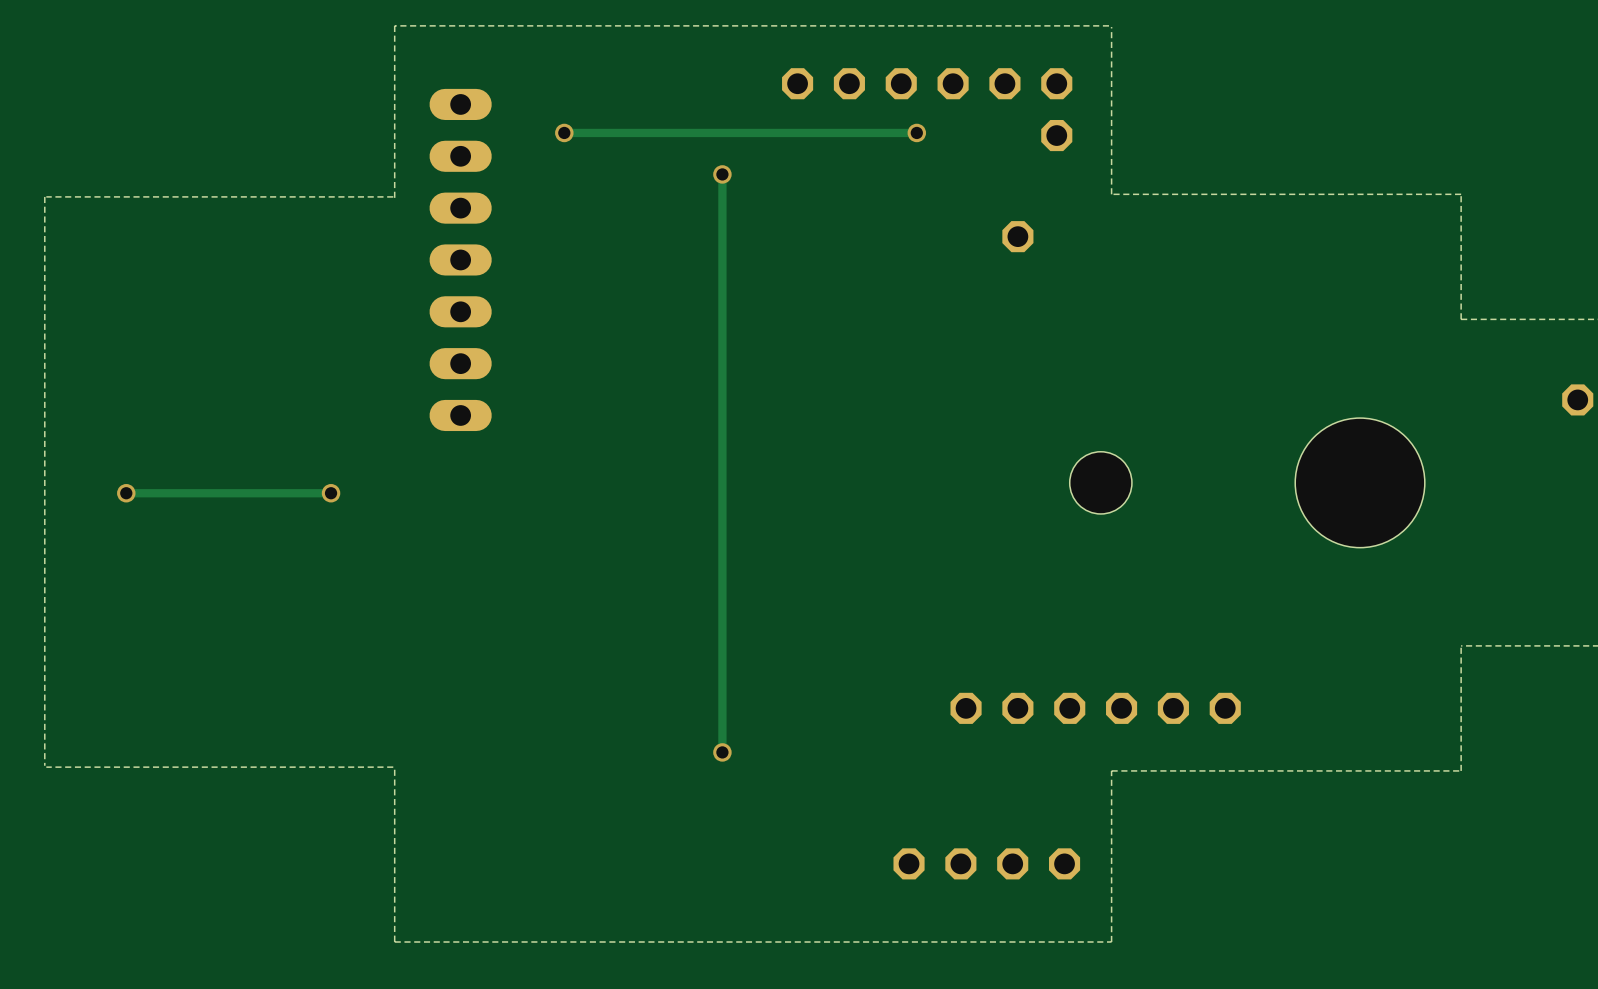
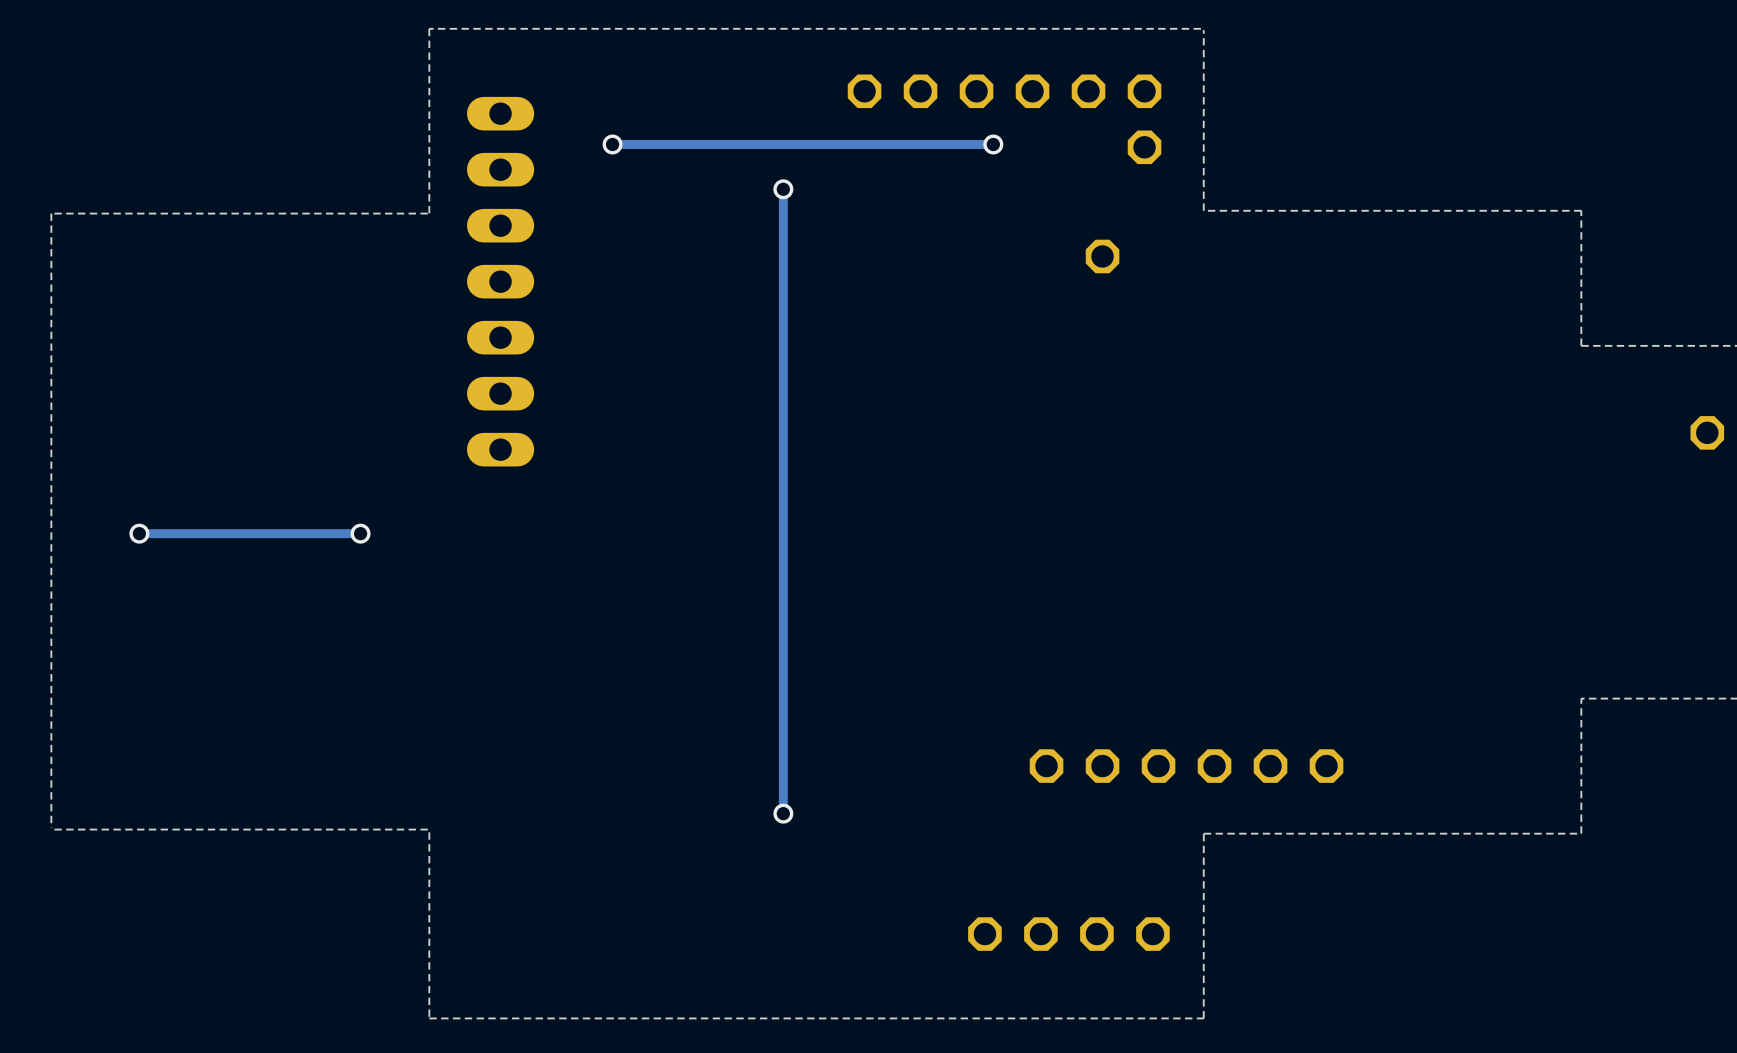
hole: (1100, 482) -> none
hole: (1360, 482) -> none

